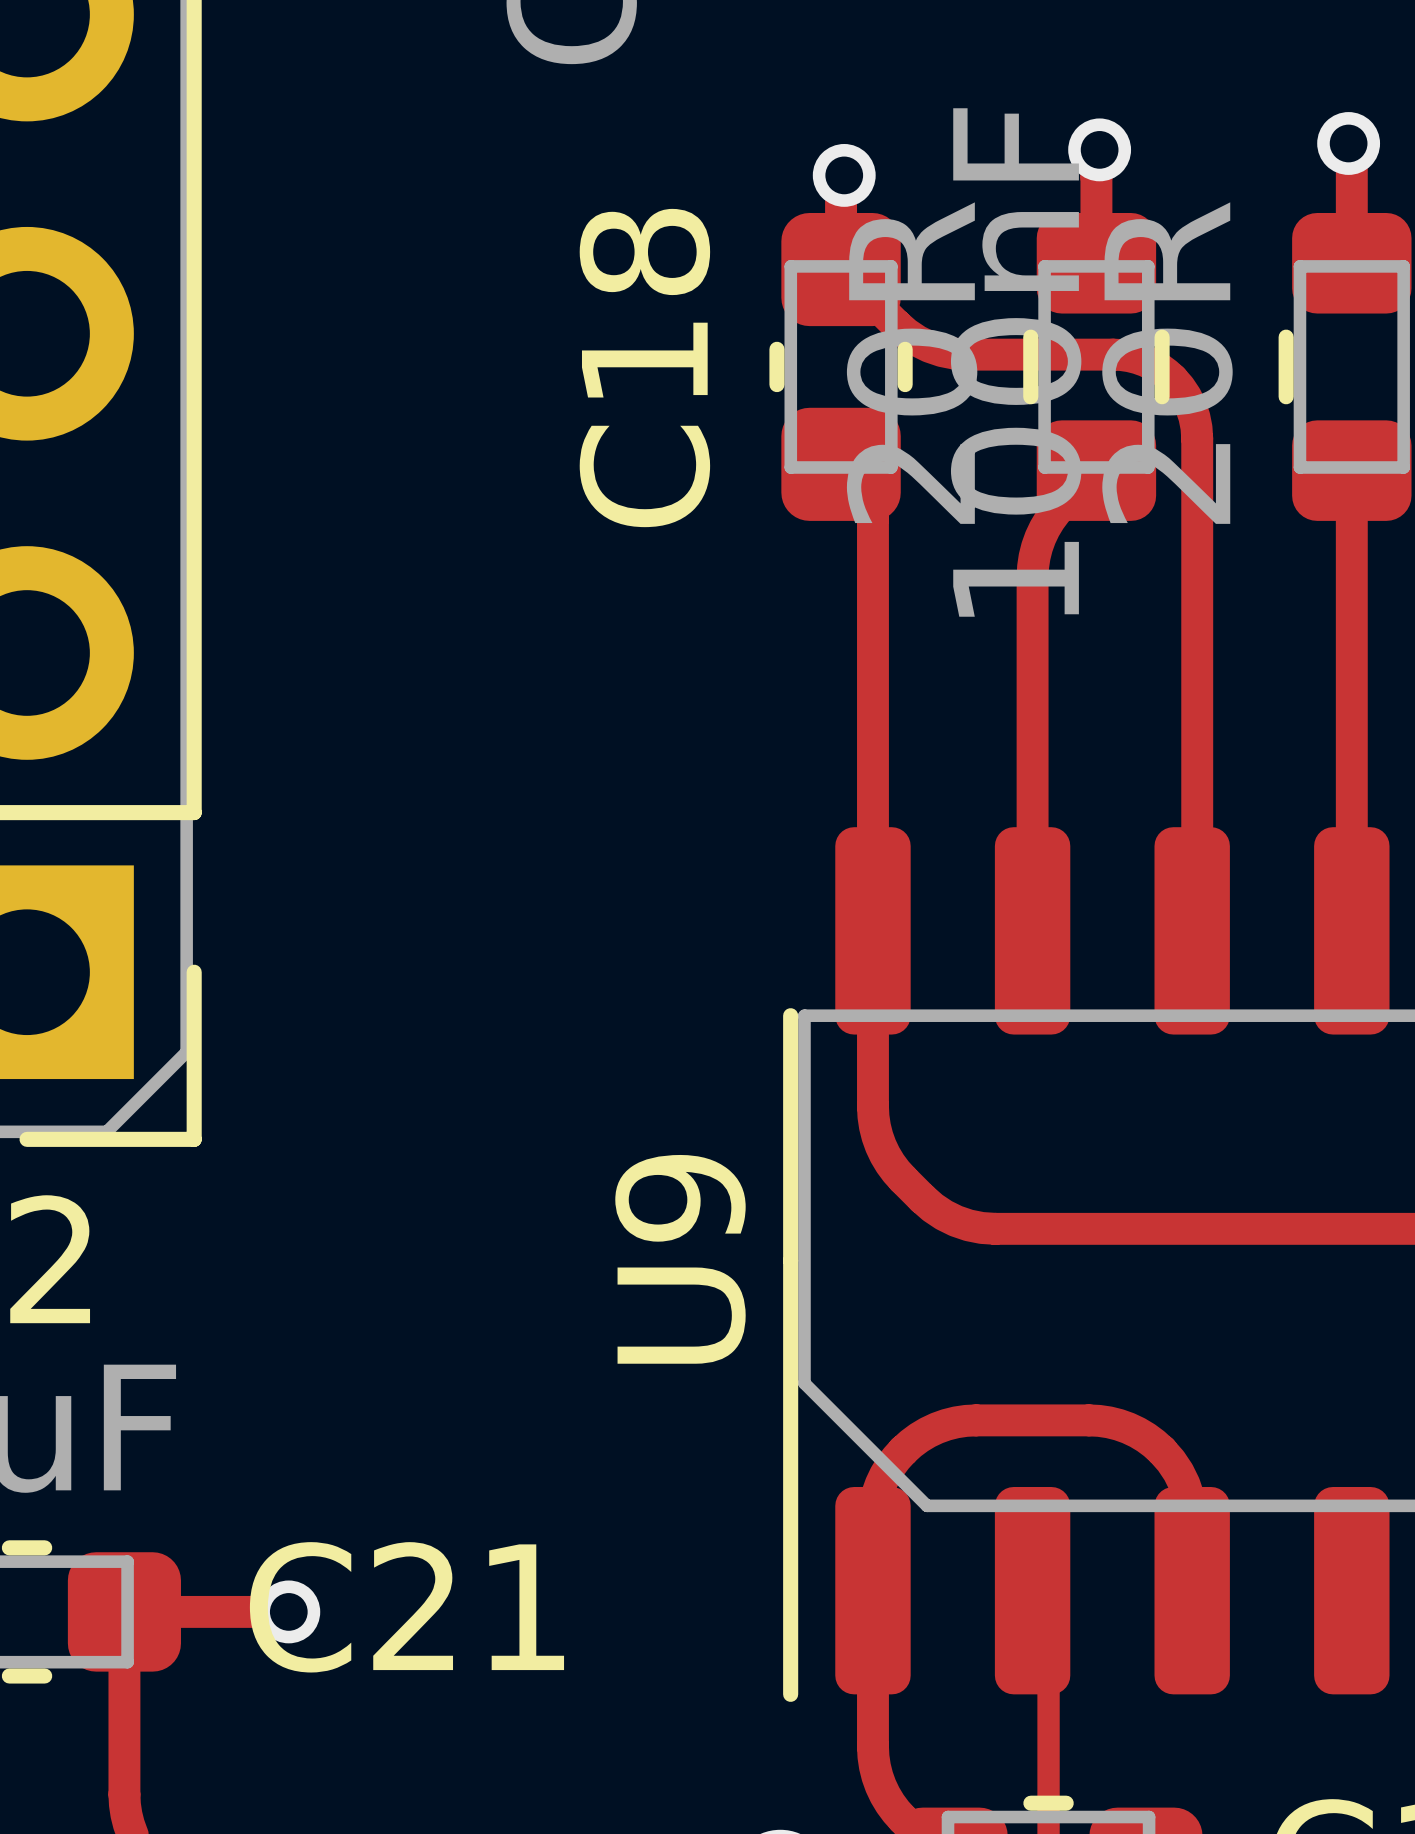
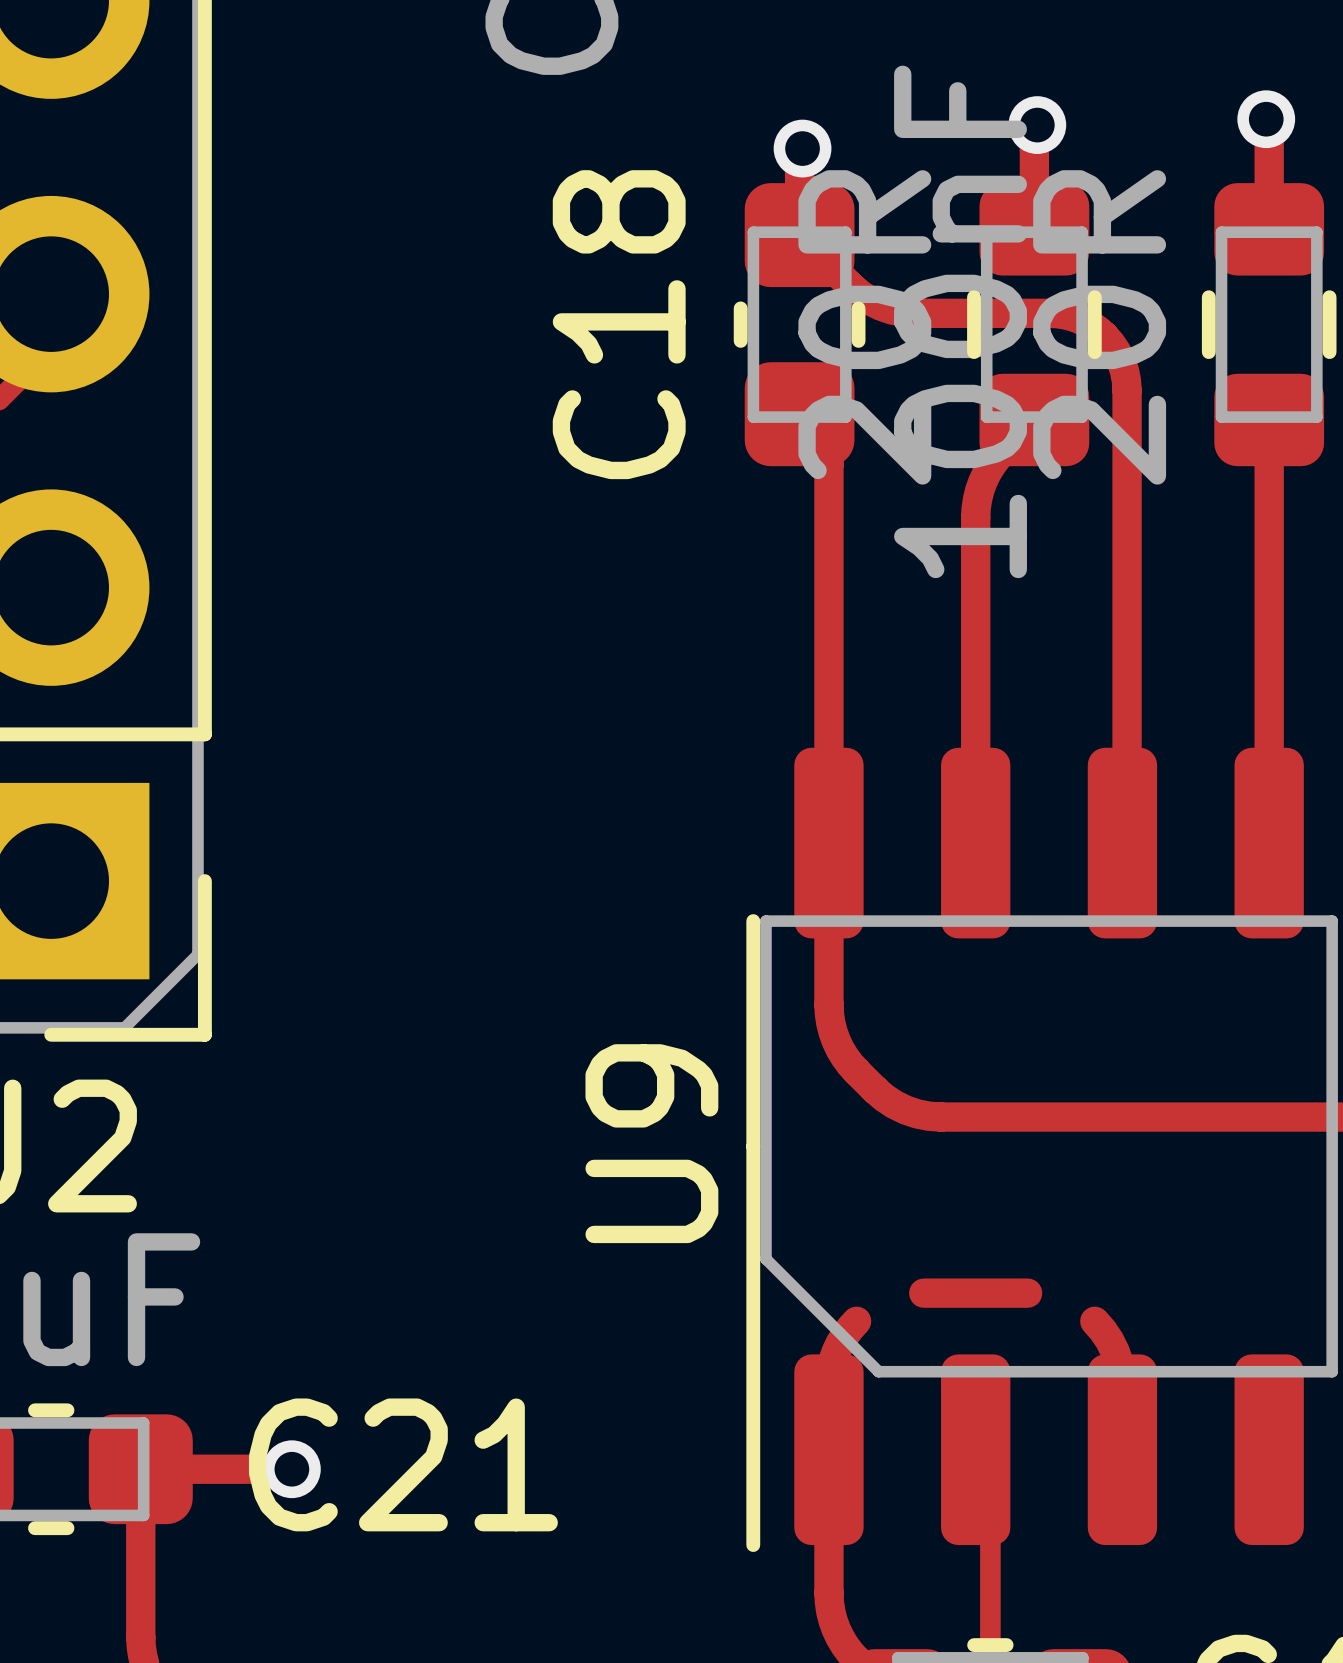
track: (976, 1420) (956, 1422) (936, 1428) (919, 1437) (903, 1450) -> none
track: (1089, 1420) (1109, 1422) (1128, 1428) (1146, 1437) (1161, 1450) -> none

